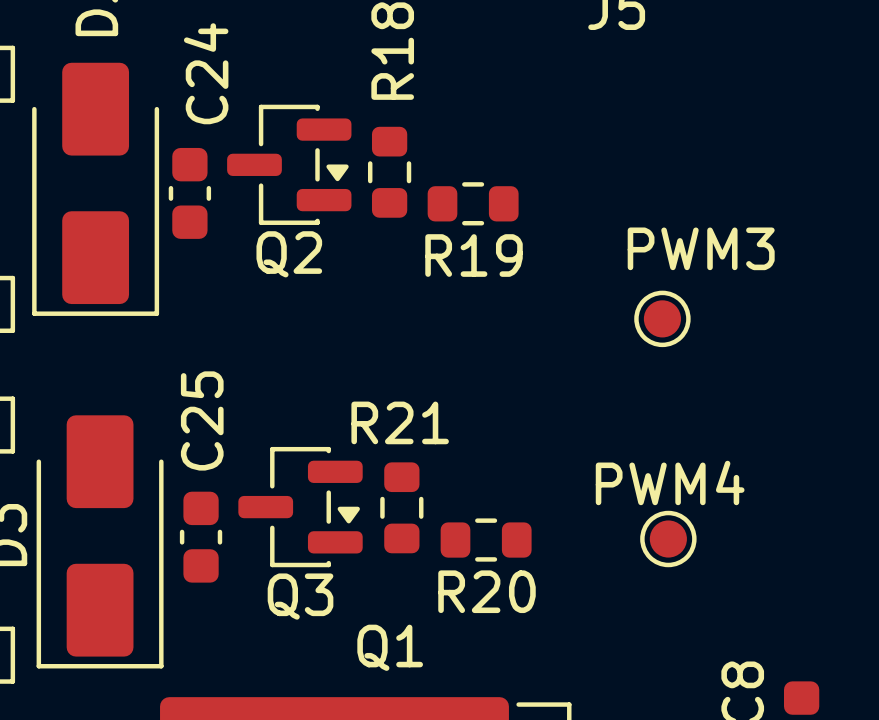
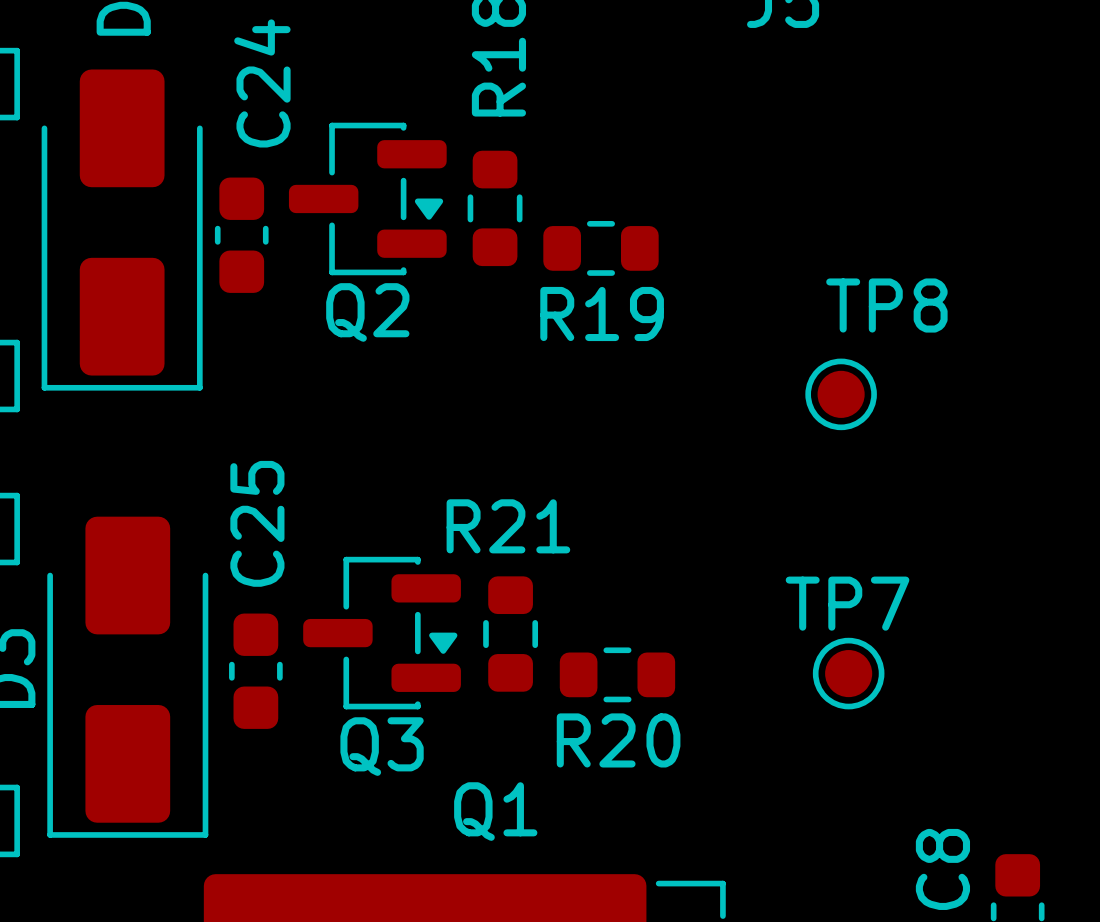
PWM3 name: PWM3 (701, 248) -> TP8 (886, 305)
PWM4 name: PWM4 (670, 482) -> TP7 (847, 603)

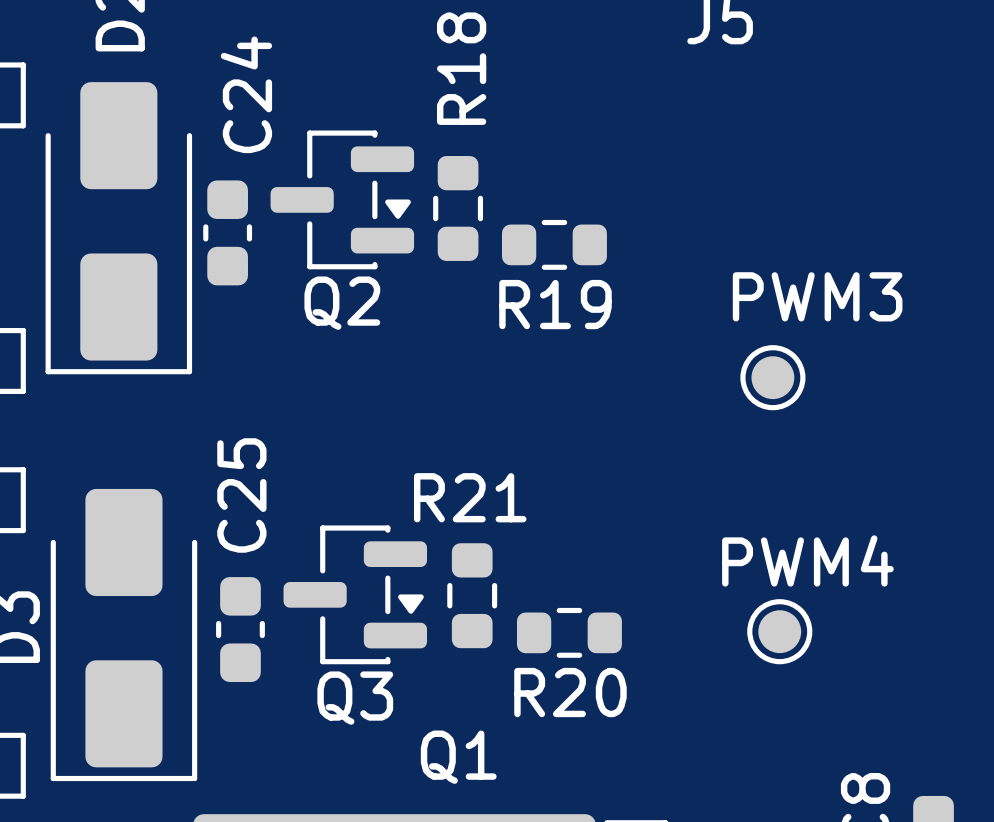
TP8 name: TP8 (886, 305) -> PWM3 (817, 296)
TP7 name: TP7 (847, 603) -> PWM4 (807, 560)

